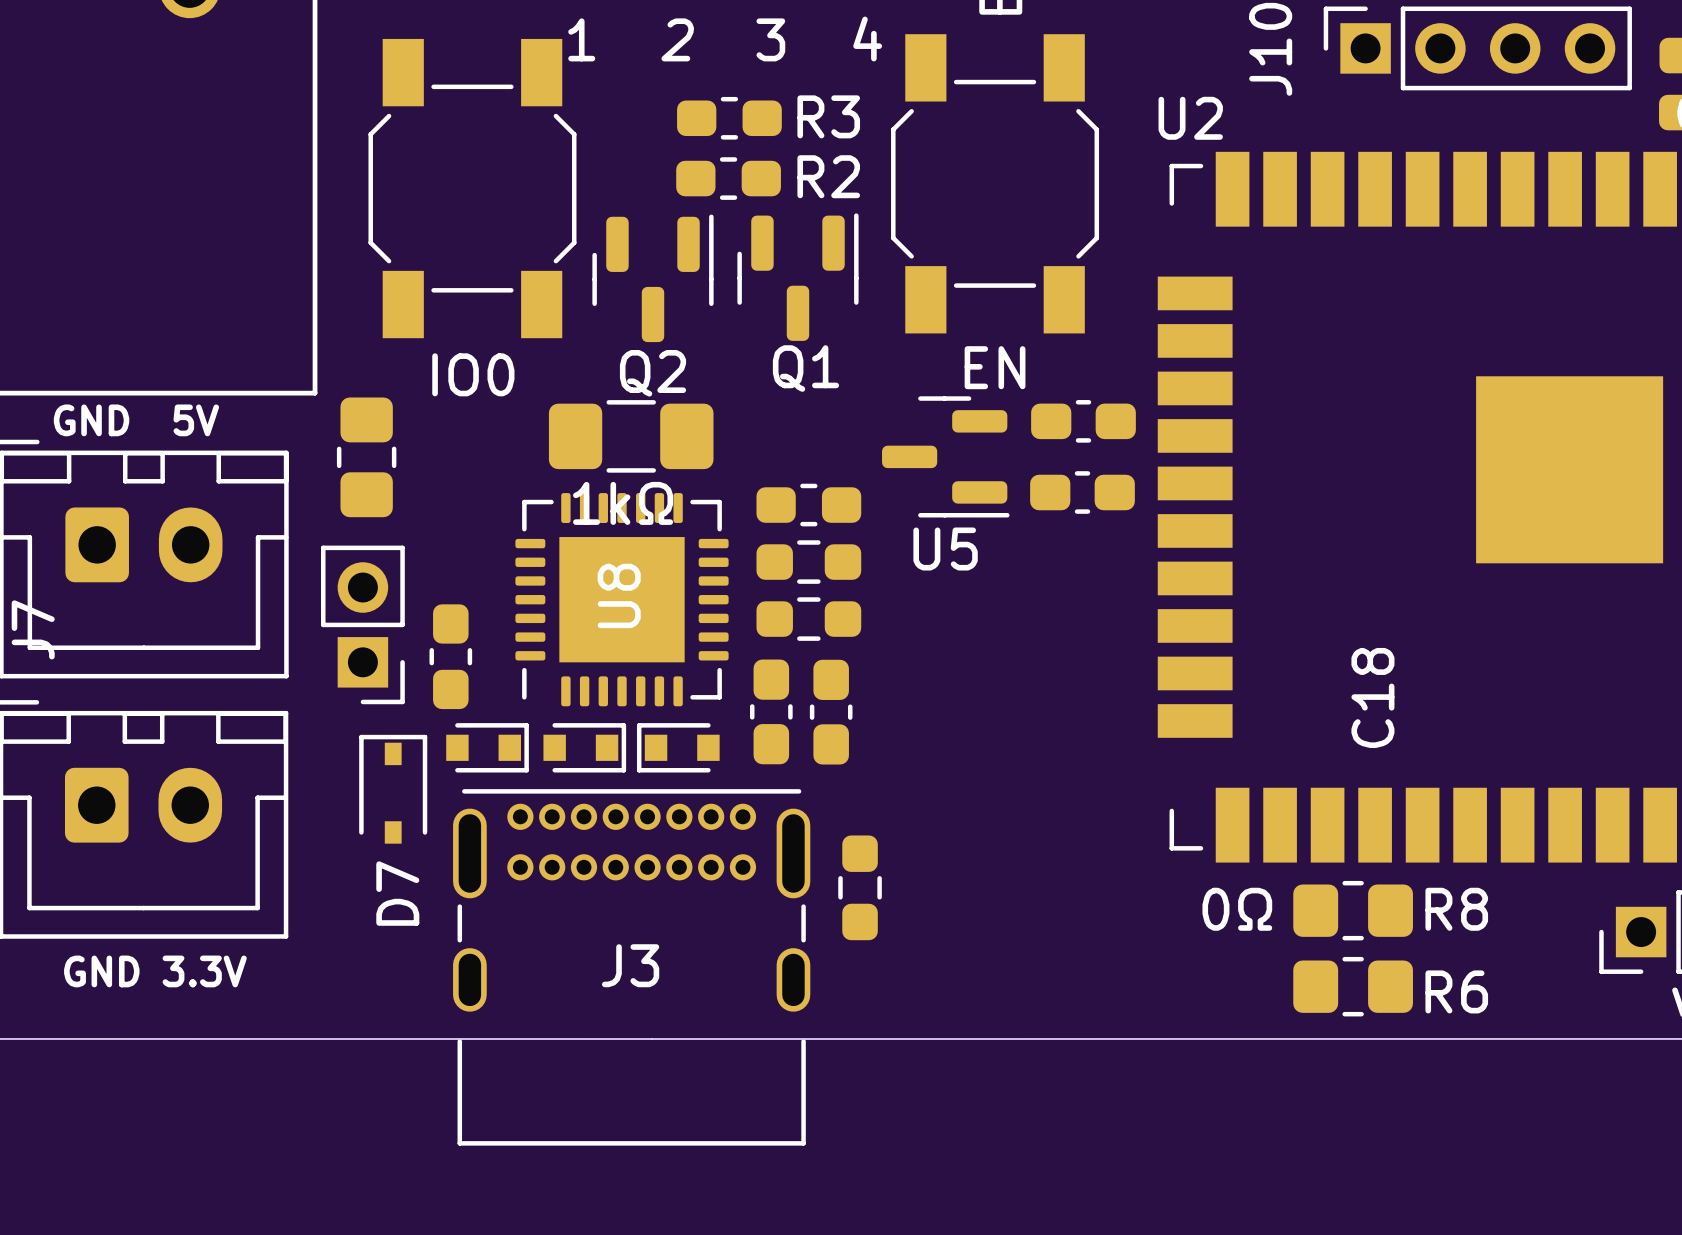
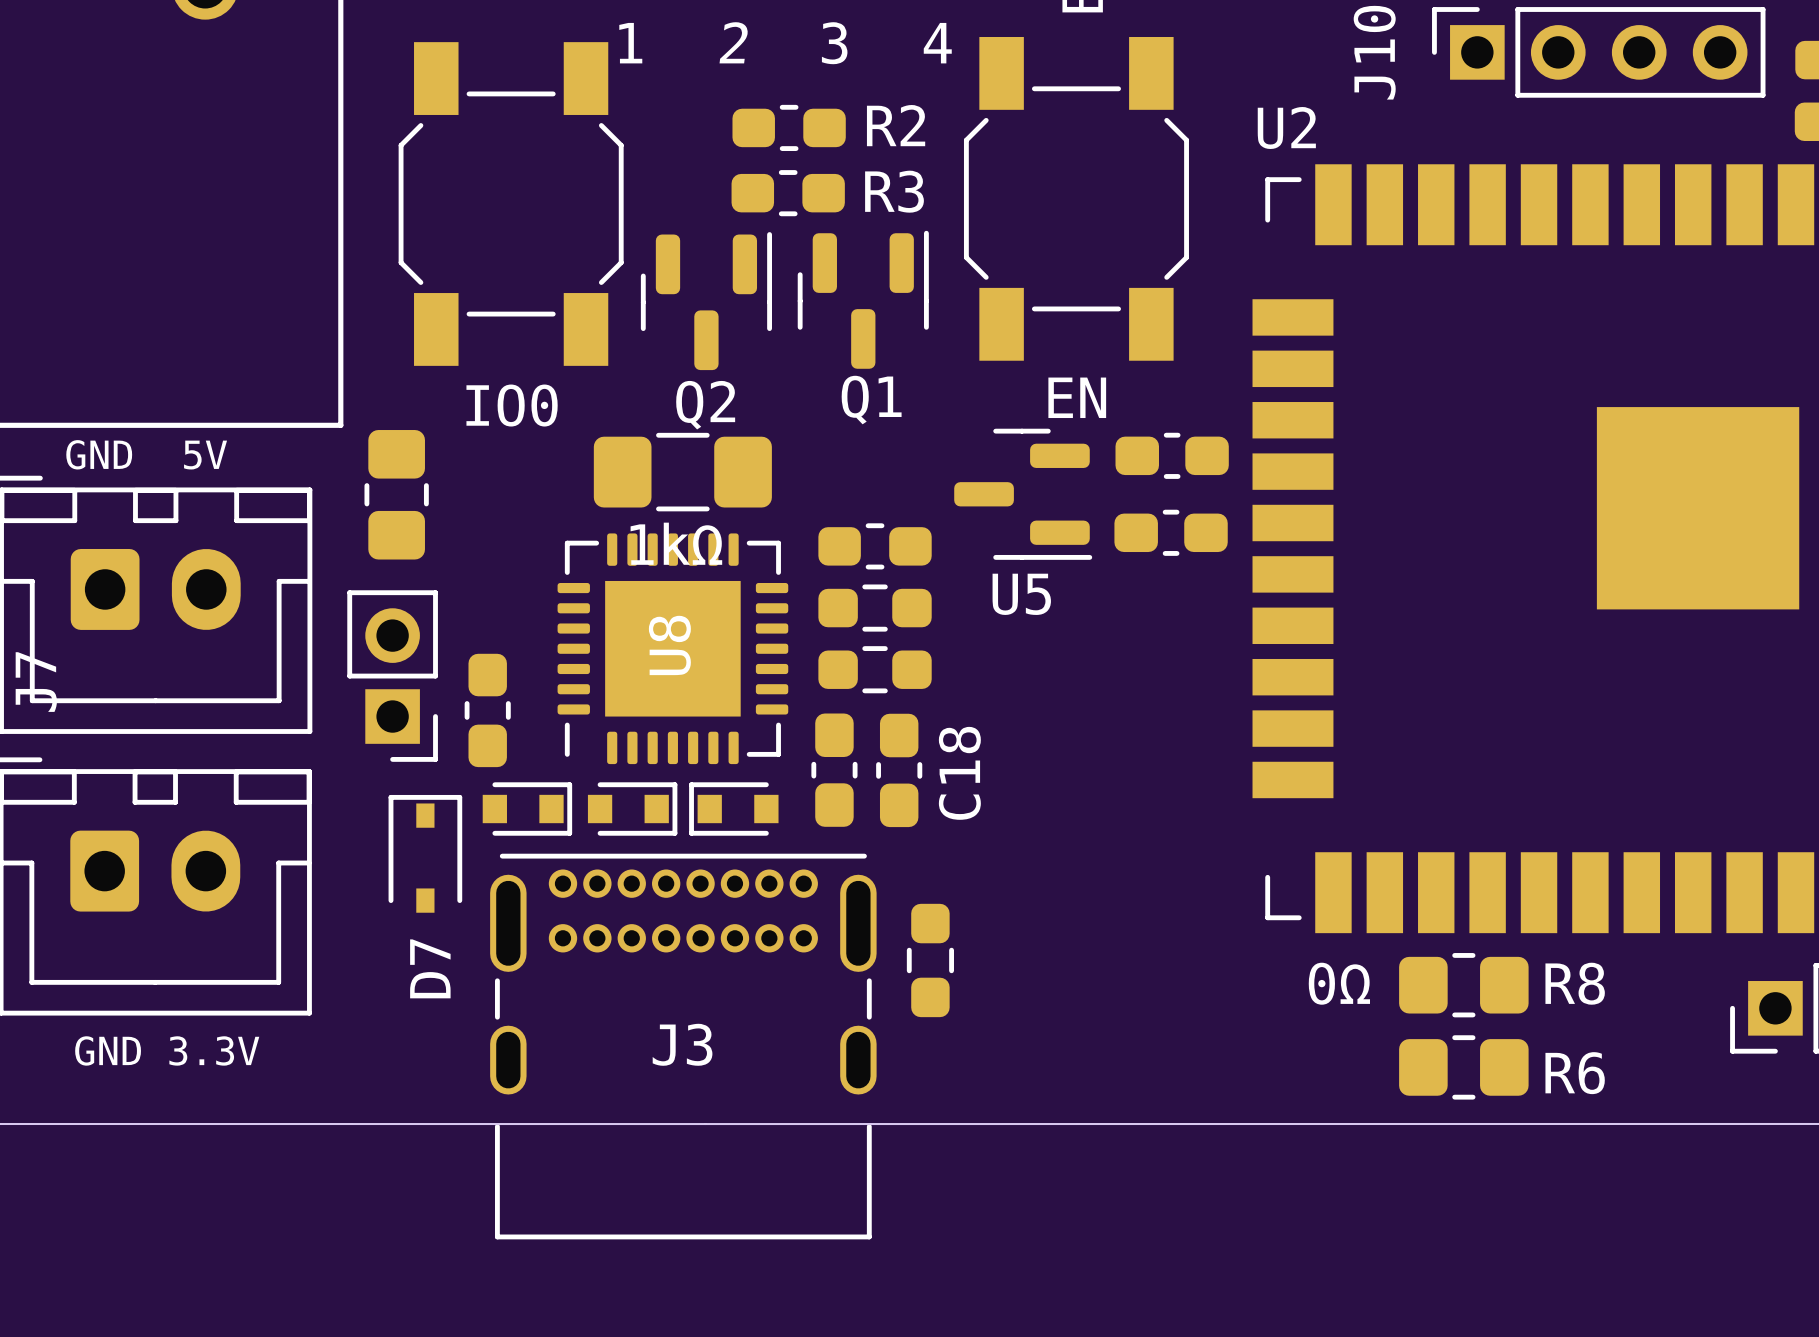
R3 name: R3 (828, 116) -> R2 (896, 125)
R2 name: R2 (828, 176) -> R3 (894, 191)
C18 name position: C18 (1372, 697) -> C18 (959, 773)

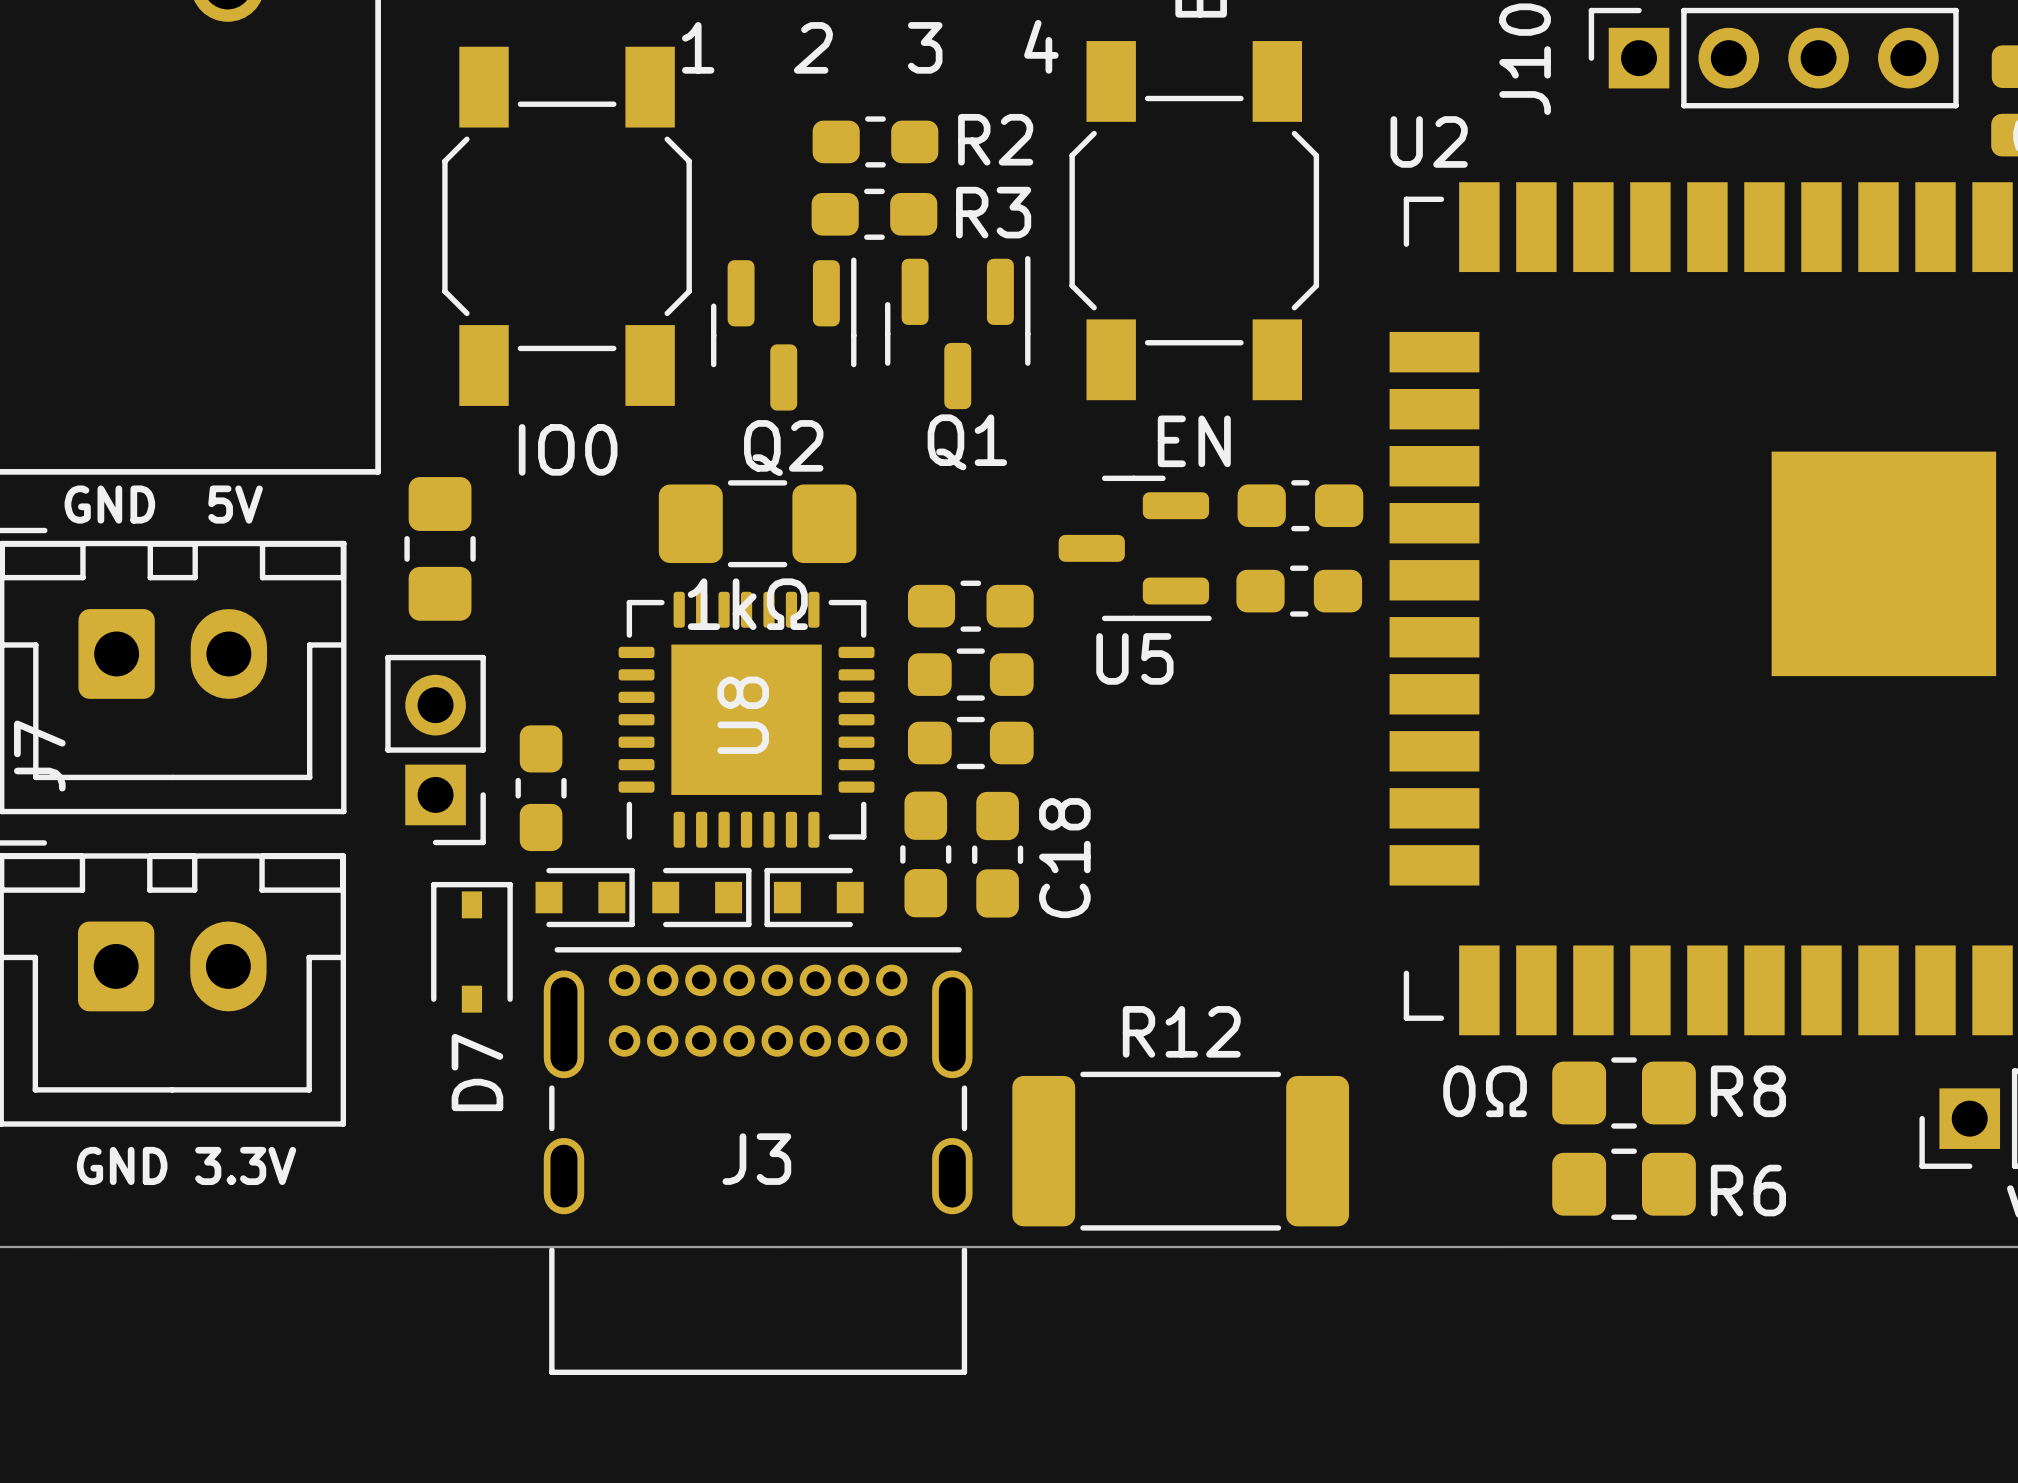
part: (930, 960) -> none
R12: none -> (1180, 1151)

